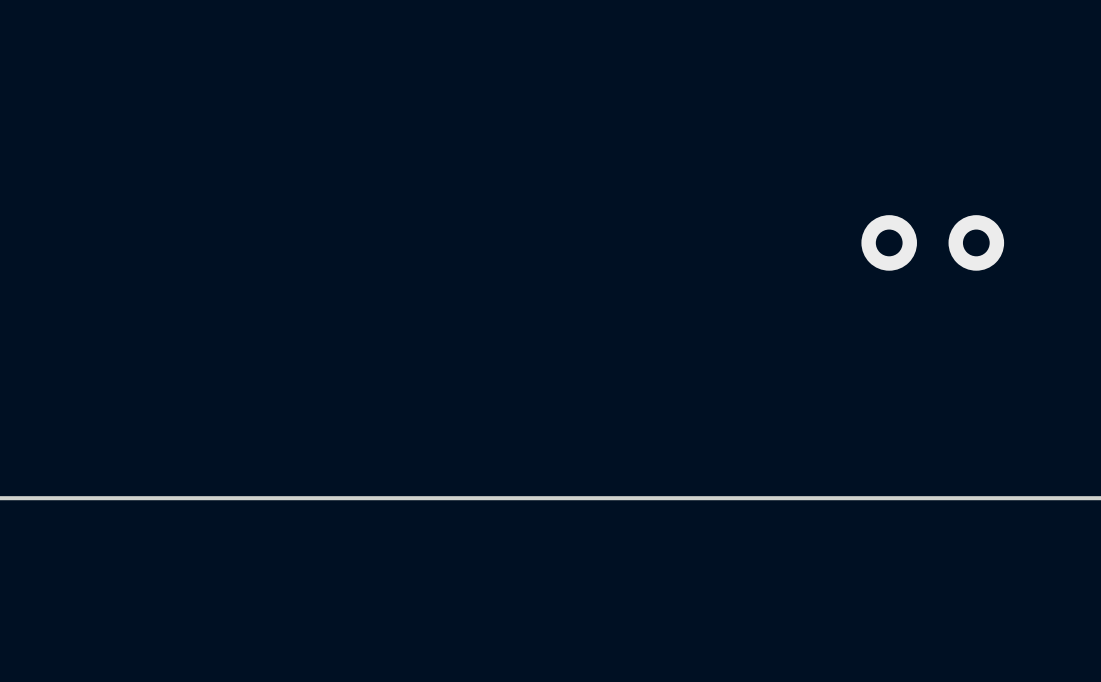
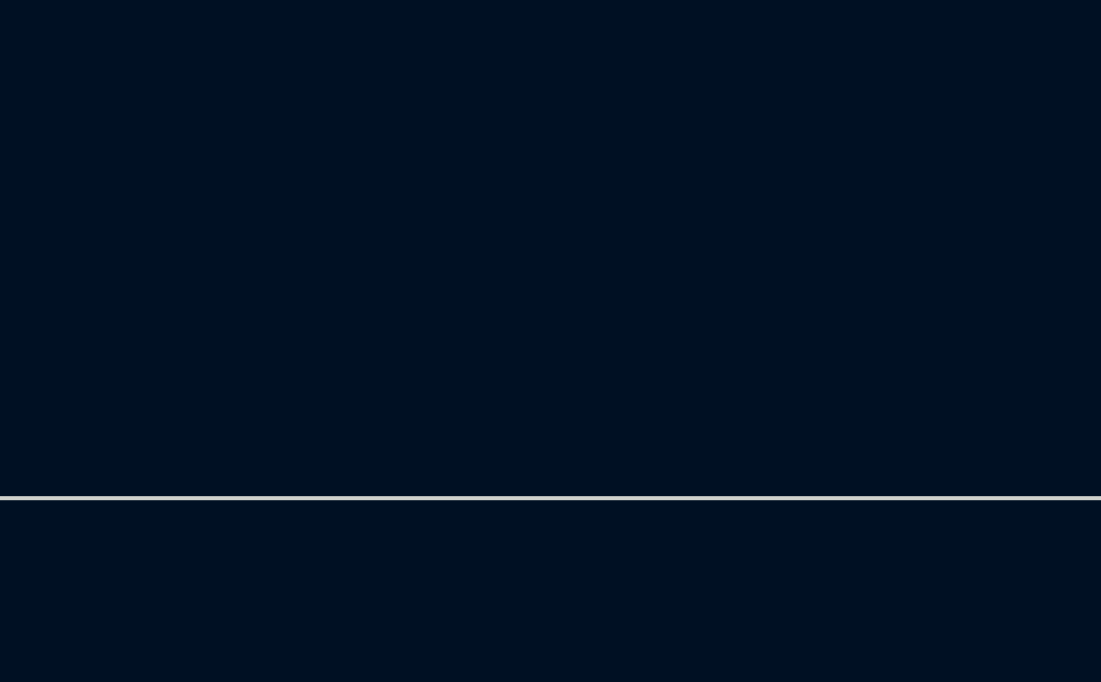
via: (889, 242) -> none
via: (976, 242) -> none

